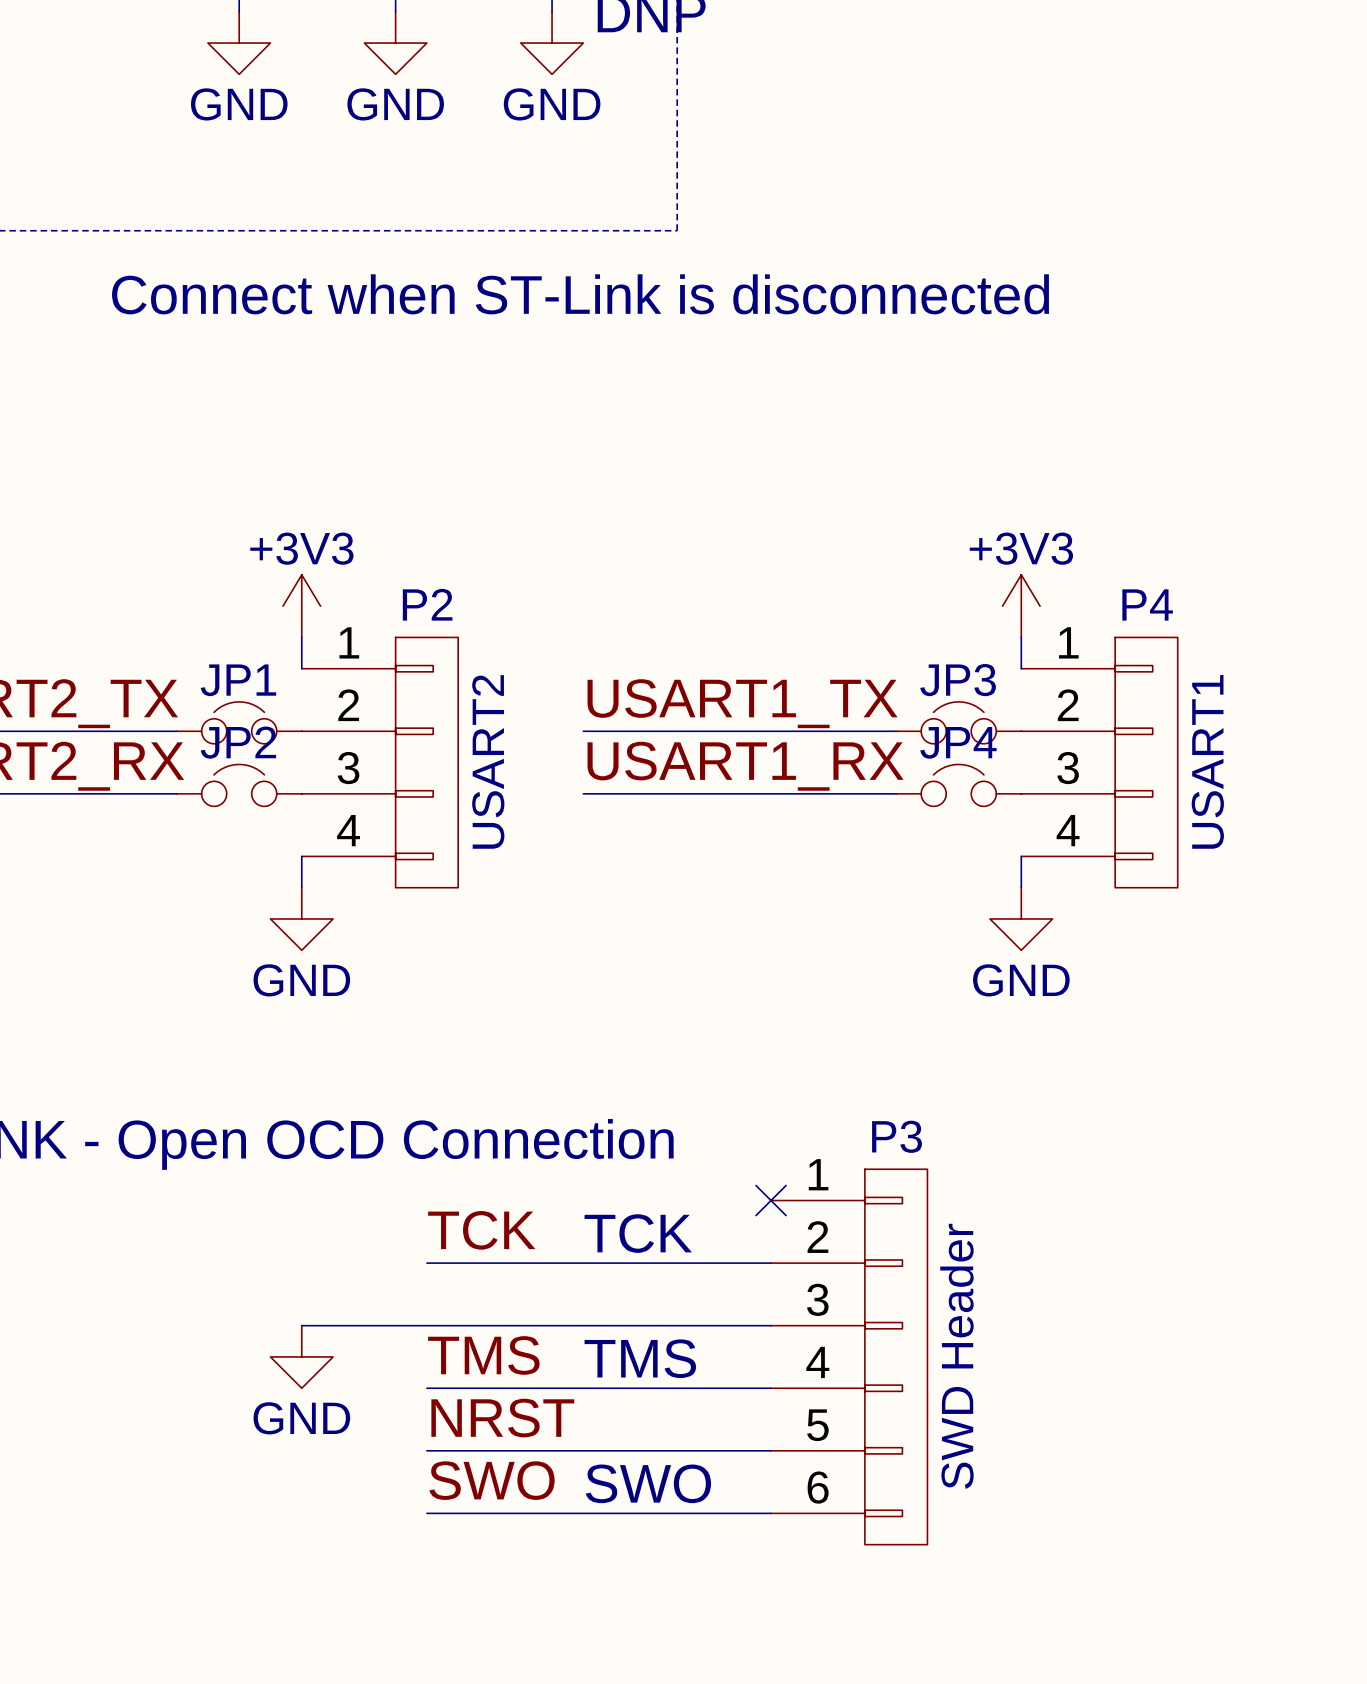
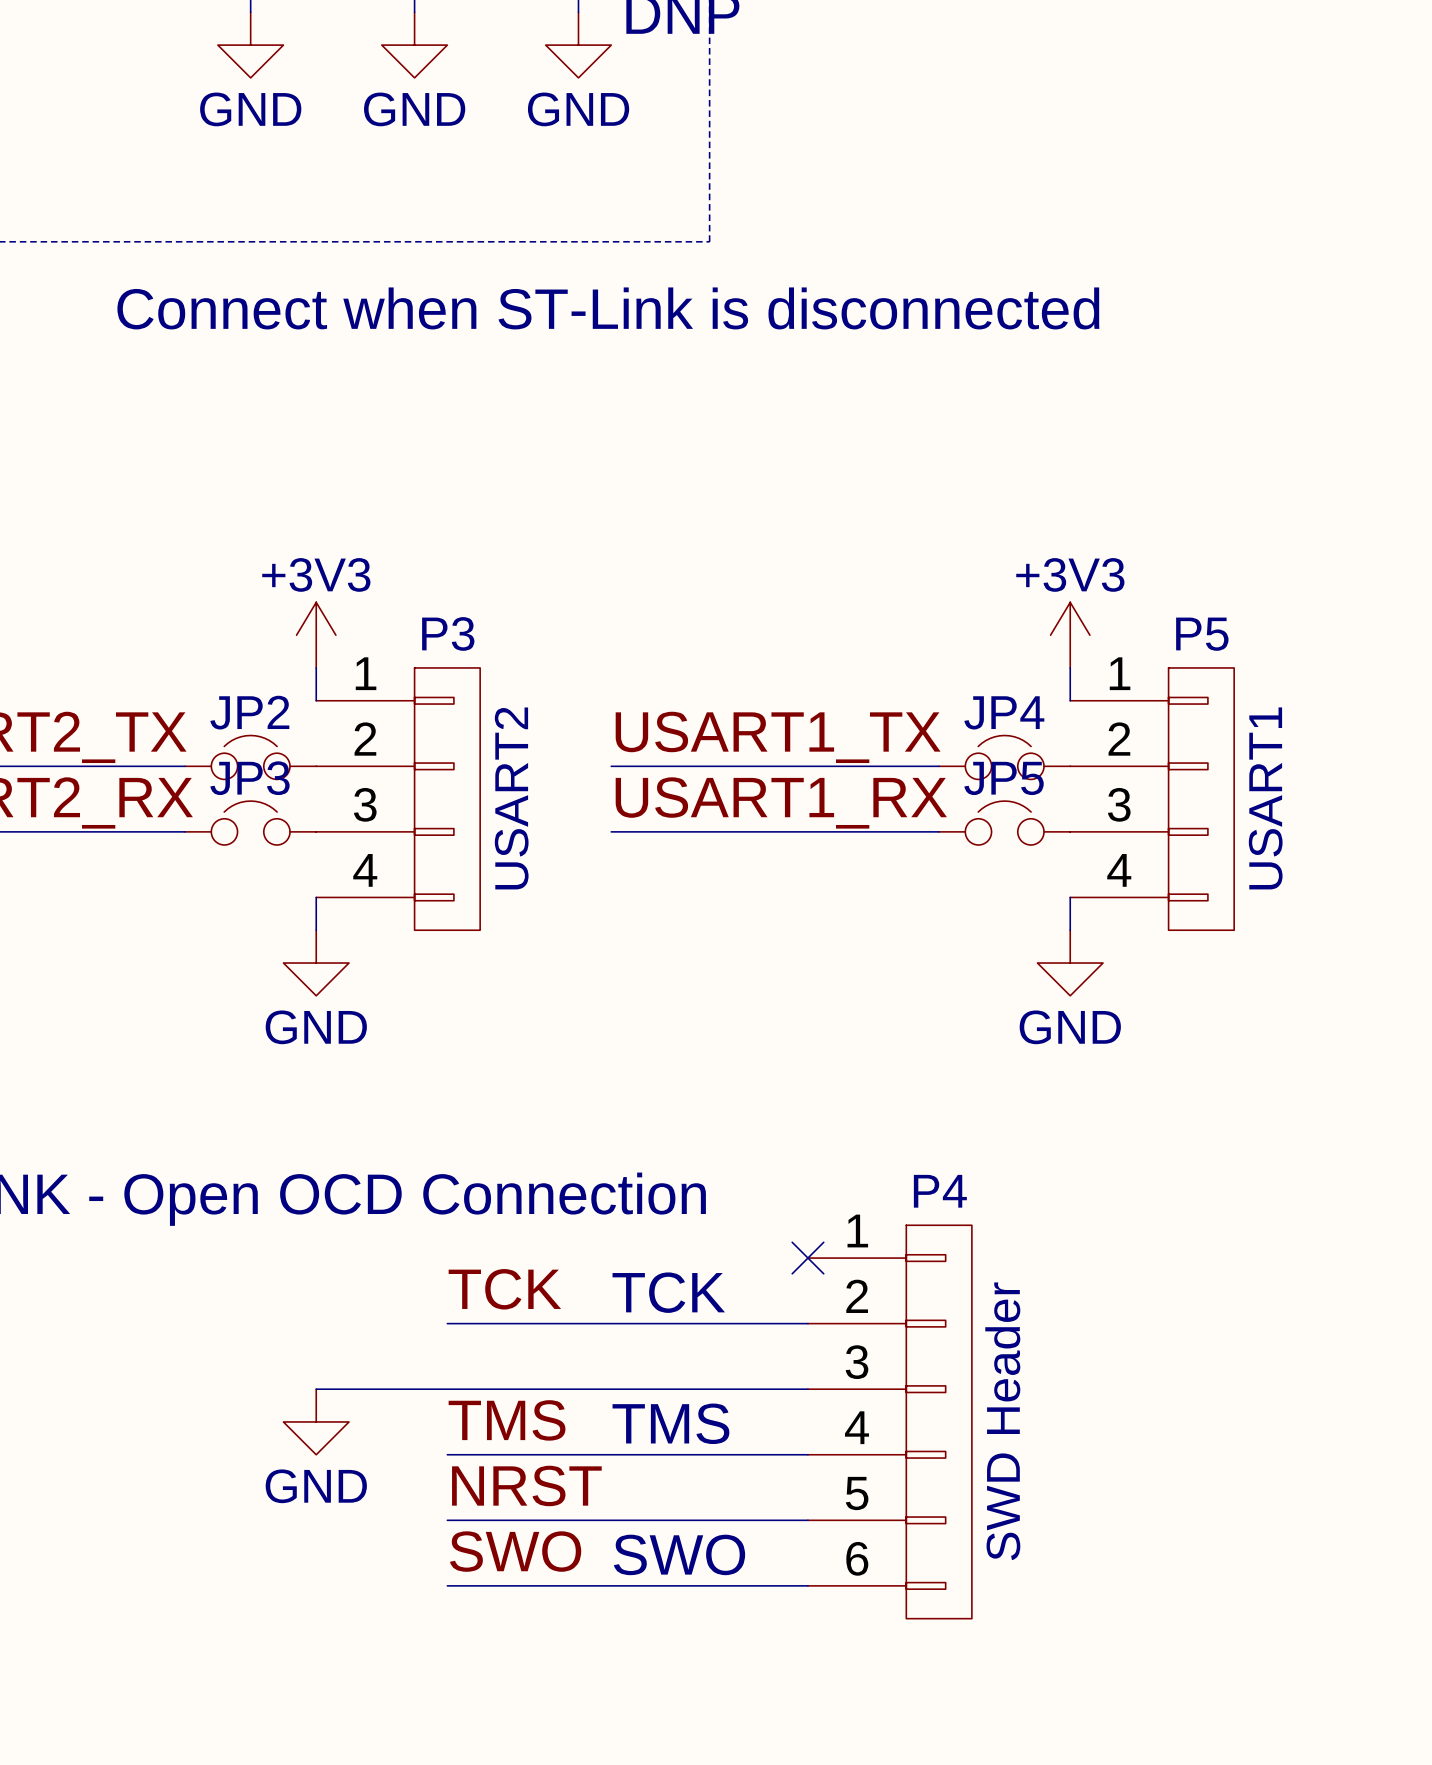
P2 name: P2 (427, 604) -> P3 (448, 633)
P4 name: P4 (1147, 604) -> P5 (1202, 634)
JP1 name: JP1 (238, 680) -> JP2 (249, 712)
JP3 name: JP3 (958, 680) -> JP4 (1004, 712)
JP2 name: JP2 (238, 742) -> JP3 (249, 778)
JP4 name: JP4 (958, 742) -> JP5 (1004, 778)
P3 name: P3 (897, 1136) -> P4 (940, 1191)

